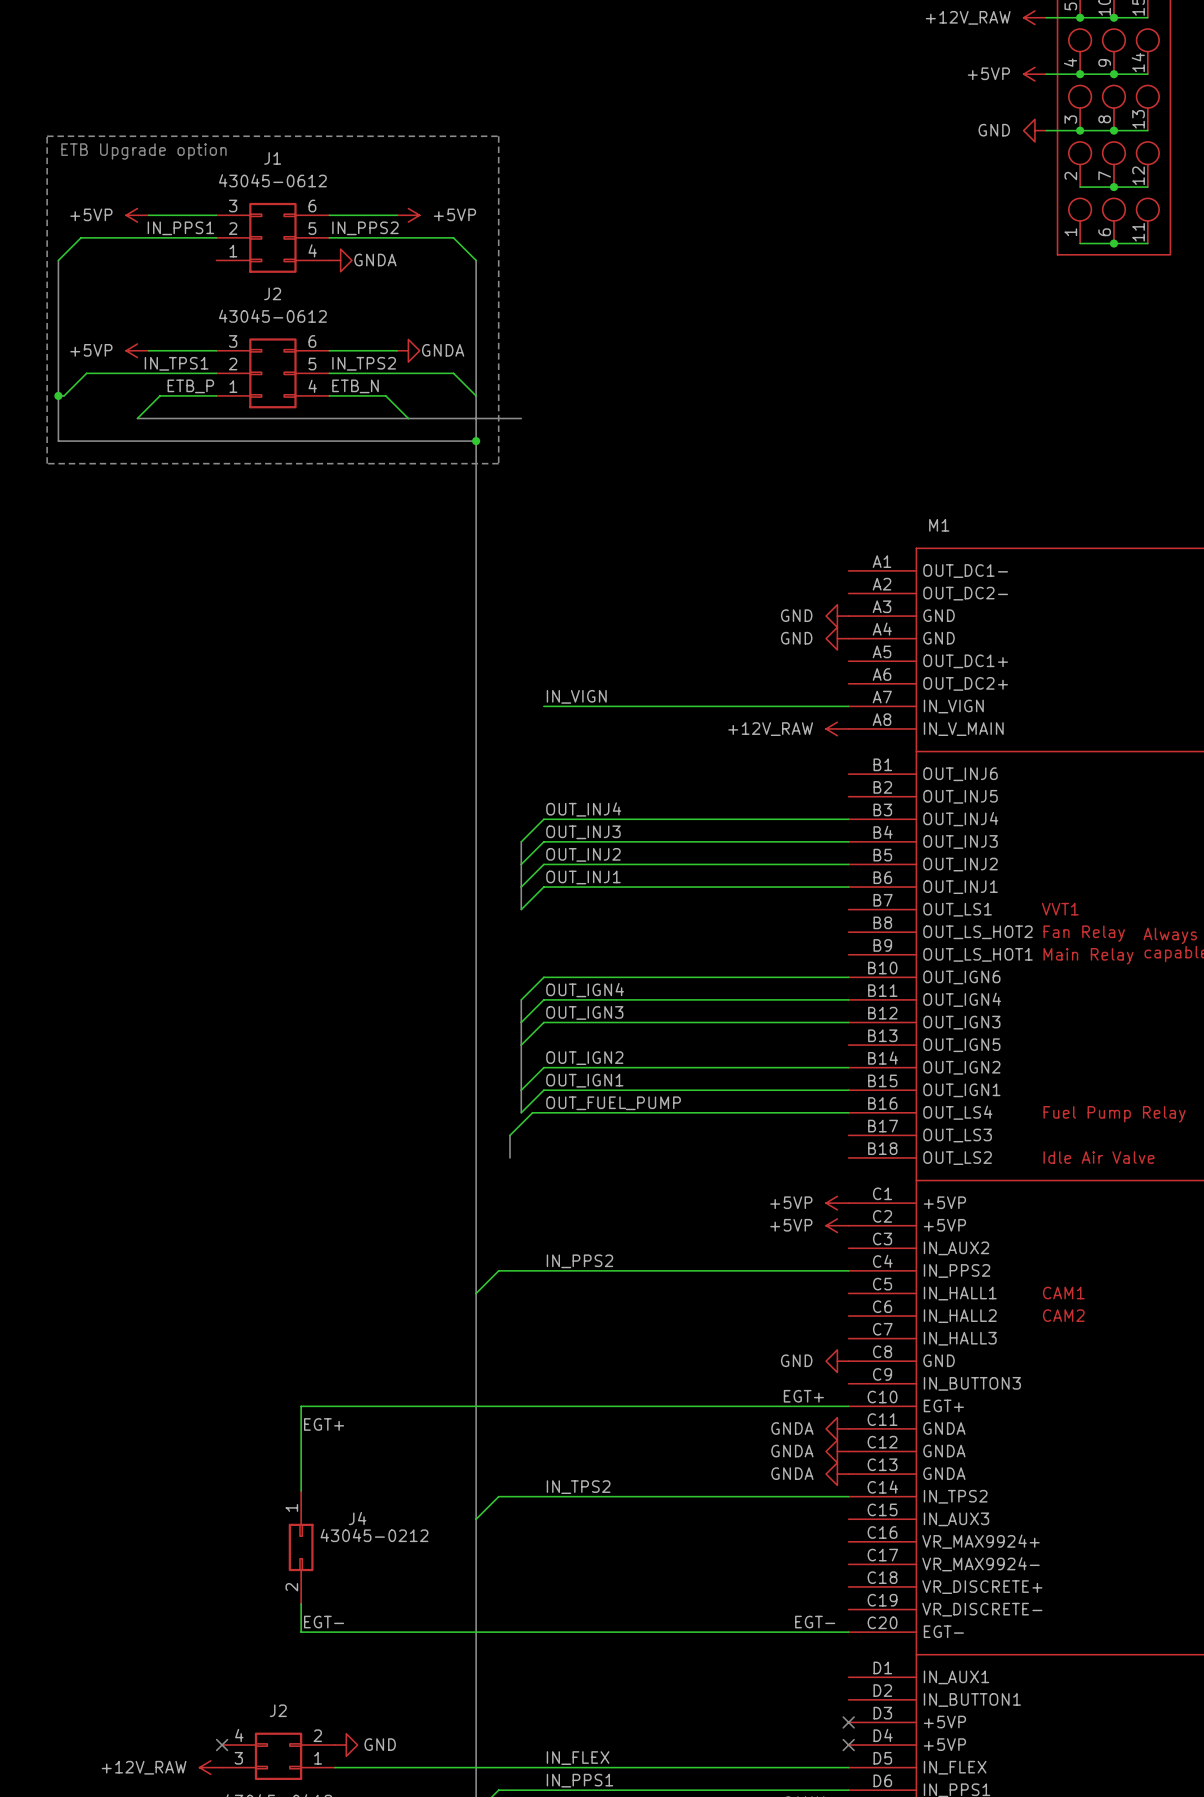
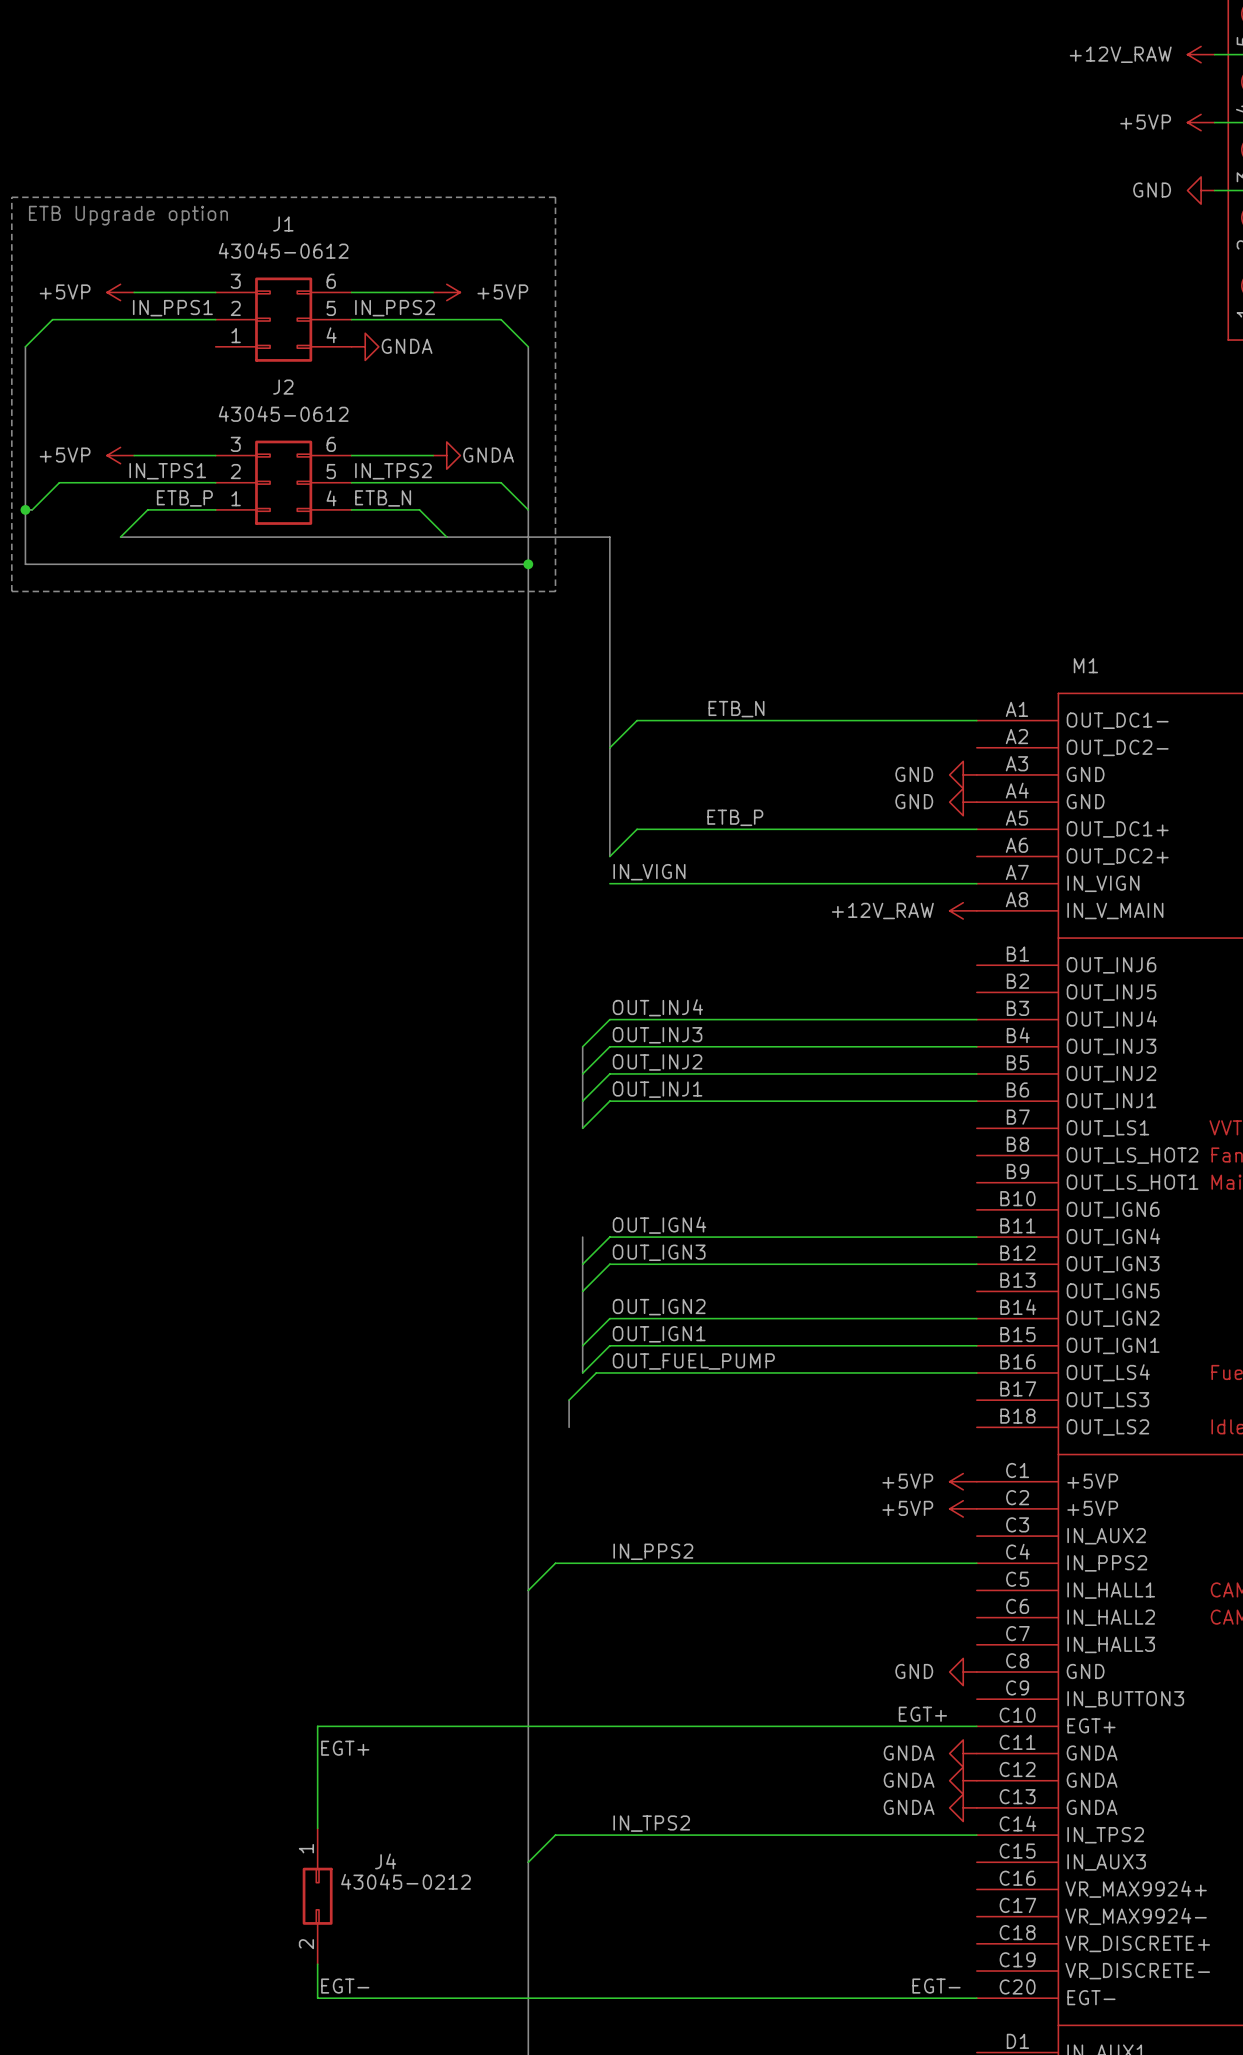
bus: none -> (582, 537) (609, 537) (609, 856)
label: none -> ETB_N (736, 709)
wire: none -> (976, 720) (637, 720) (609, 747)
label: none -> ETB_P (735, 817)
wire: none -> (976, 829) (637, 829) (609, 856)
wire: (848, 977) (543, 977) (521, 999) -> none

